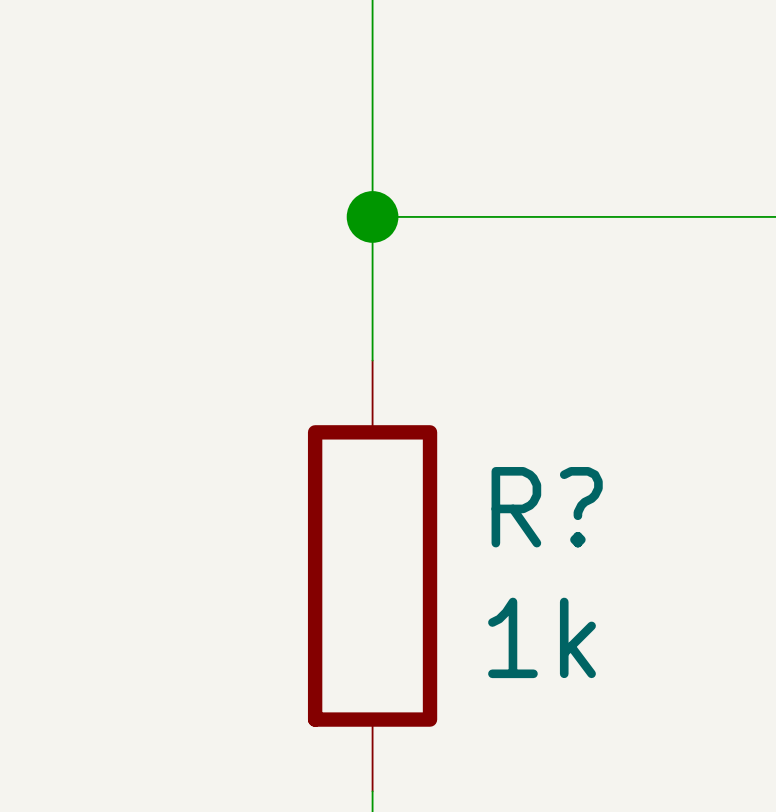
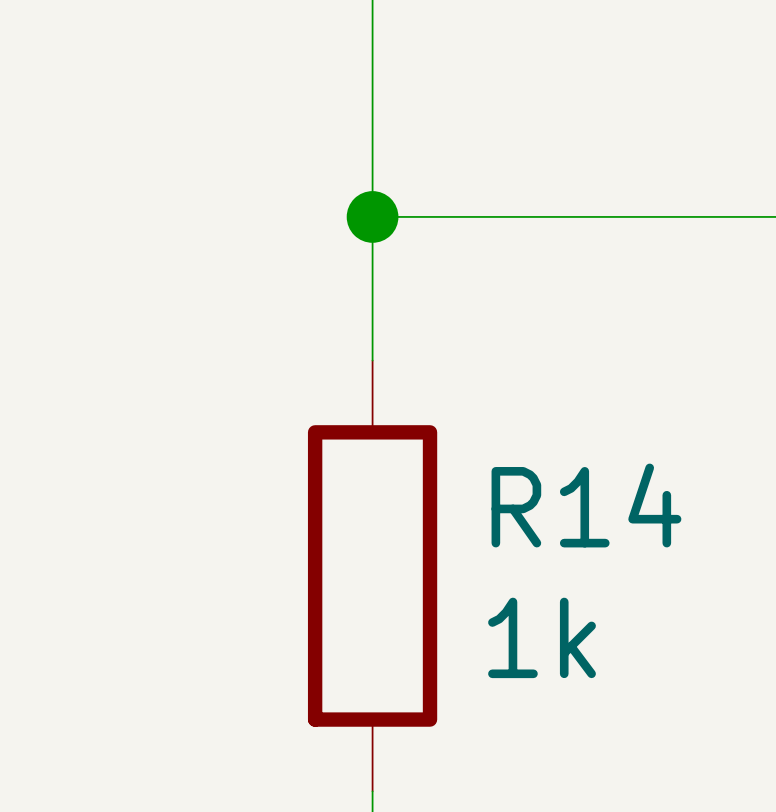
R? name: R? (547, 507) -> R14 (586, 505)

